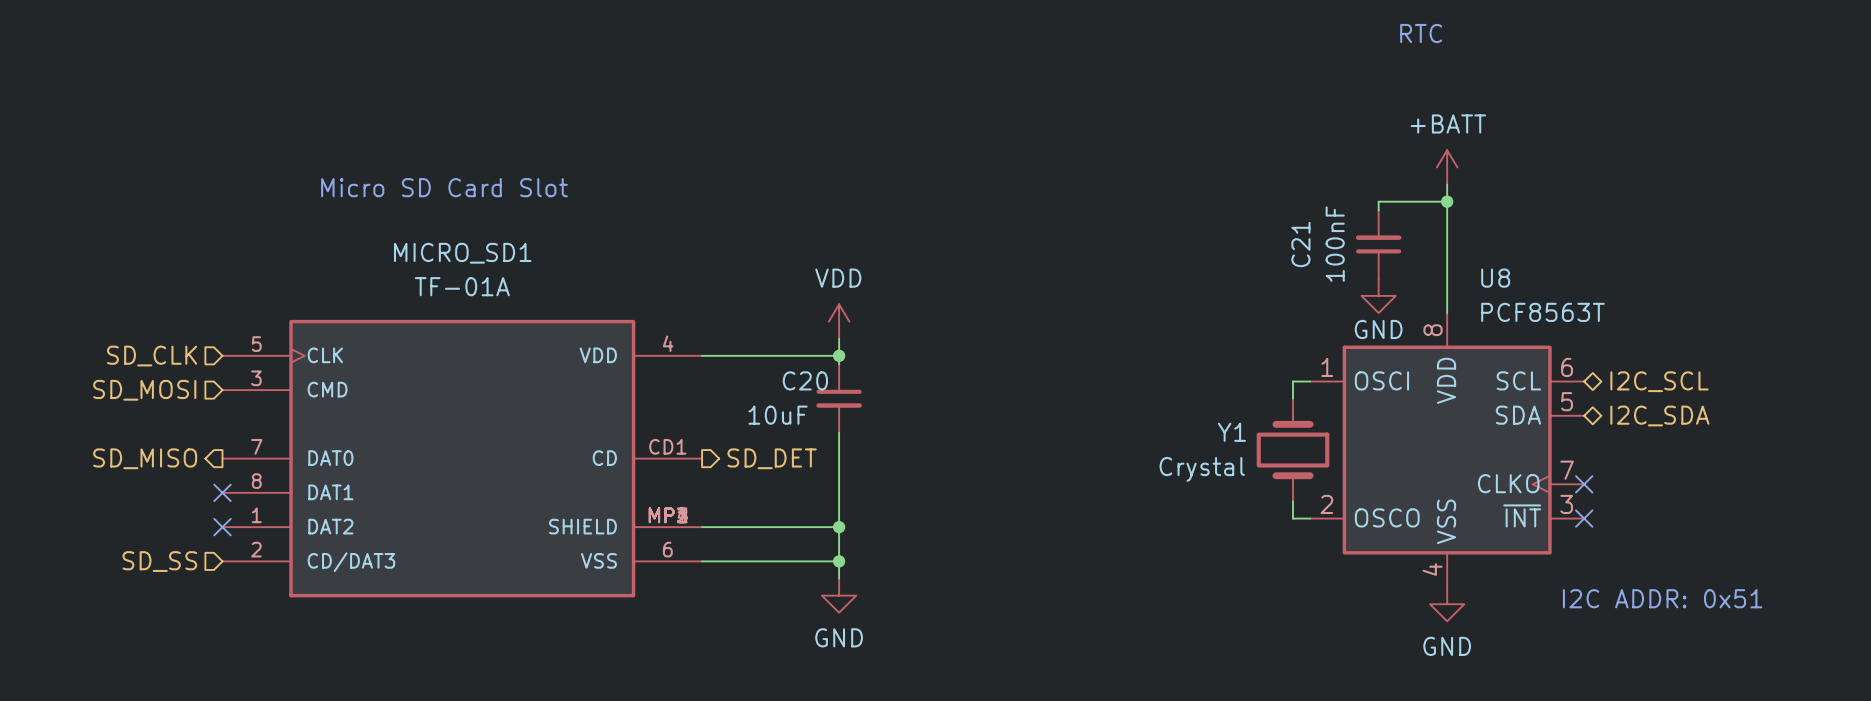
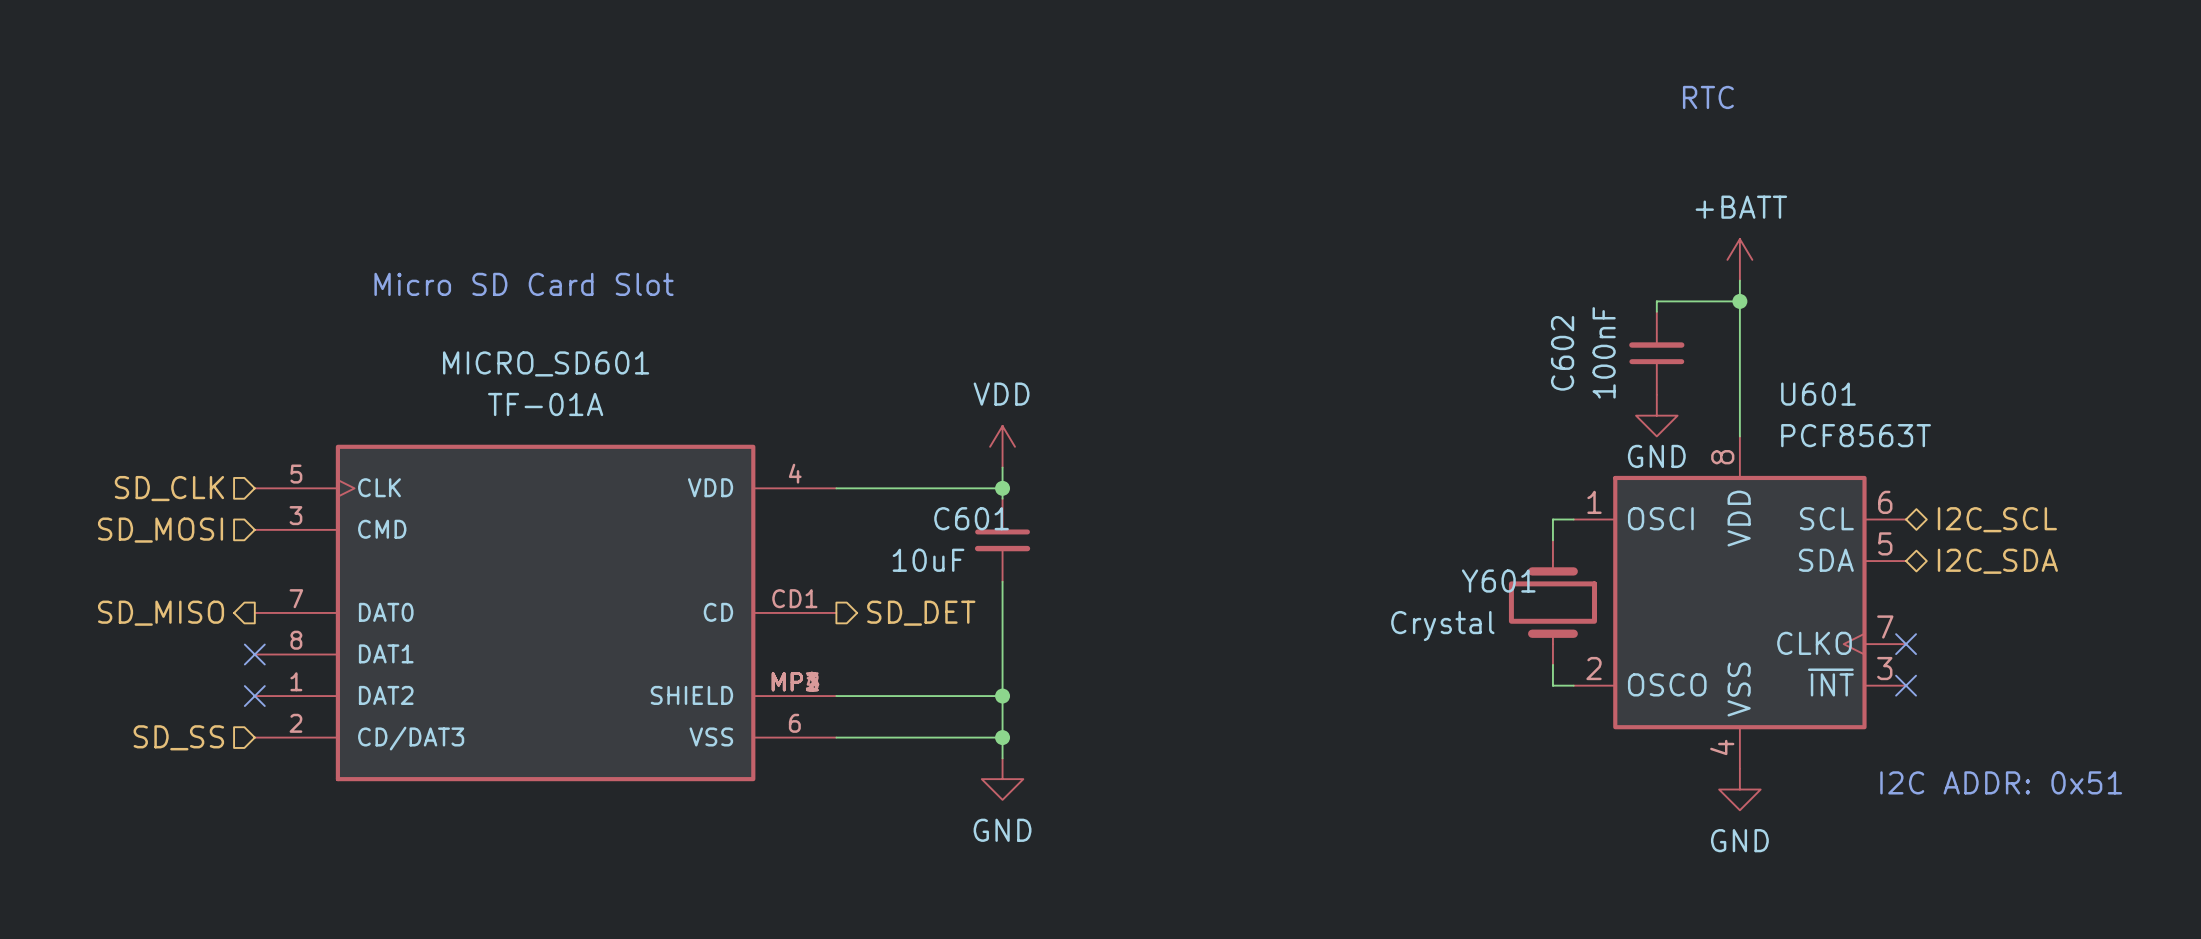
C21 name: C21 (1300, 244) -> C602 (1562, 353)
MICRO_SD1 name: MICRO_SD1 (462, 253) -> MICRO_SD601 (546, 363)
U8 name: U8 (1495, 278) -> U601 (1818, 394)
C20 name: C20 (805, 380) -> C601 (971, 518)
Y1 name: Y1 (1231, 432) -> Y601 (1498, 581)

